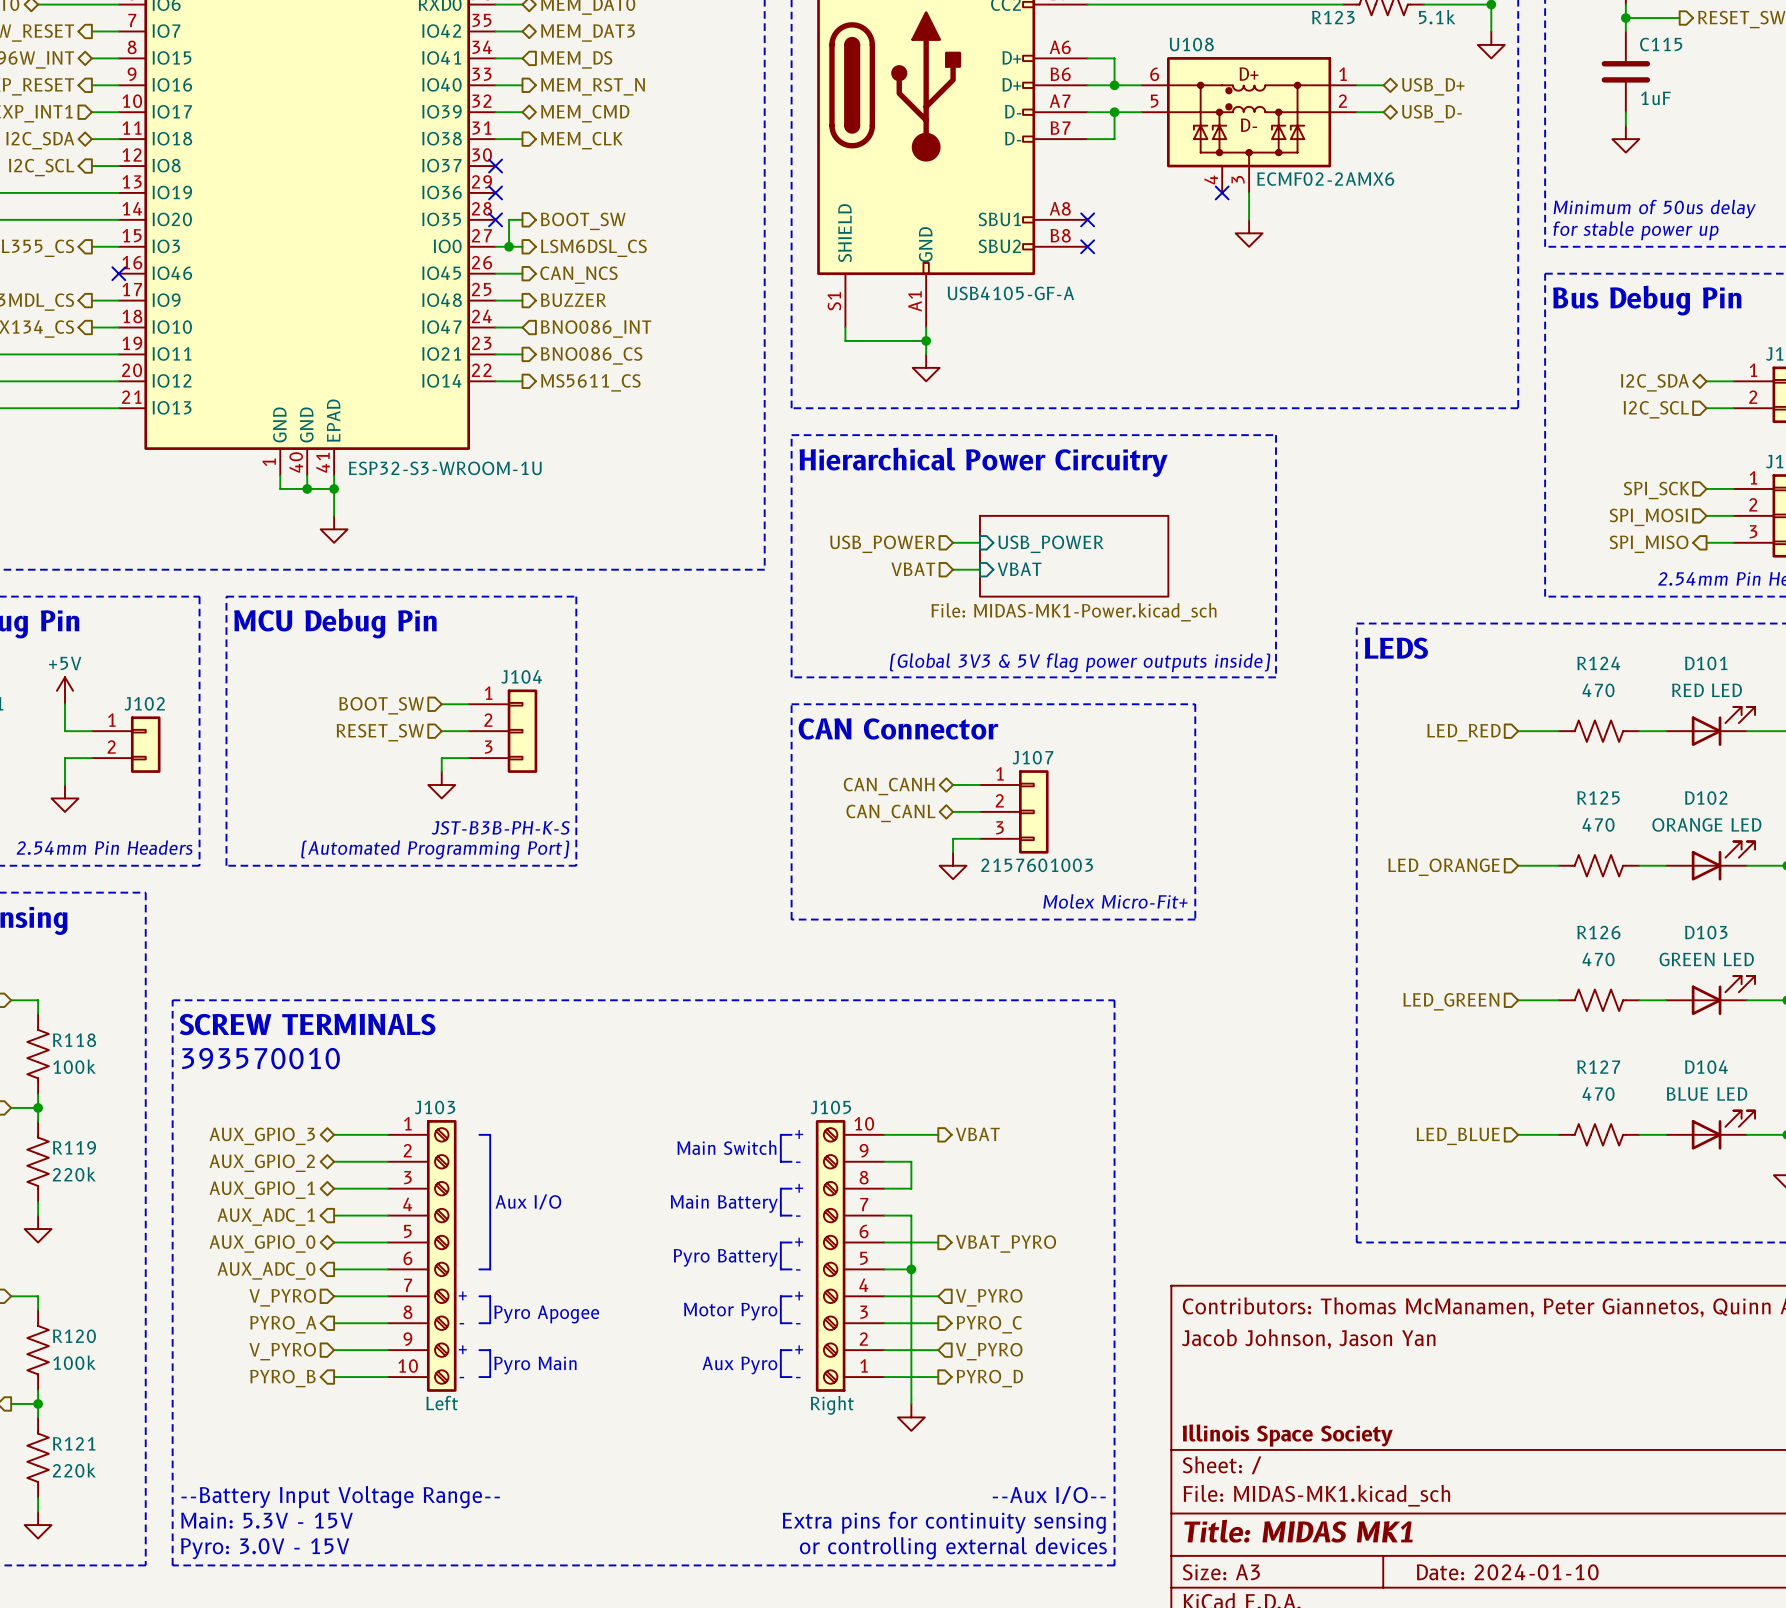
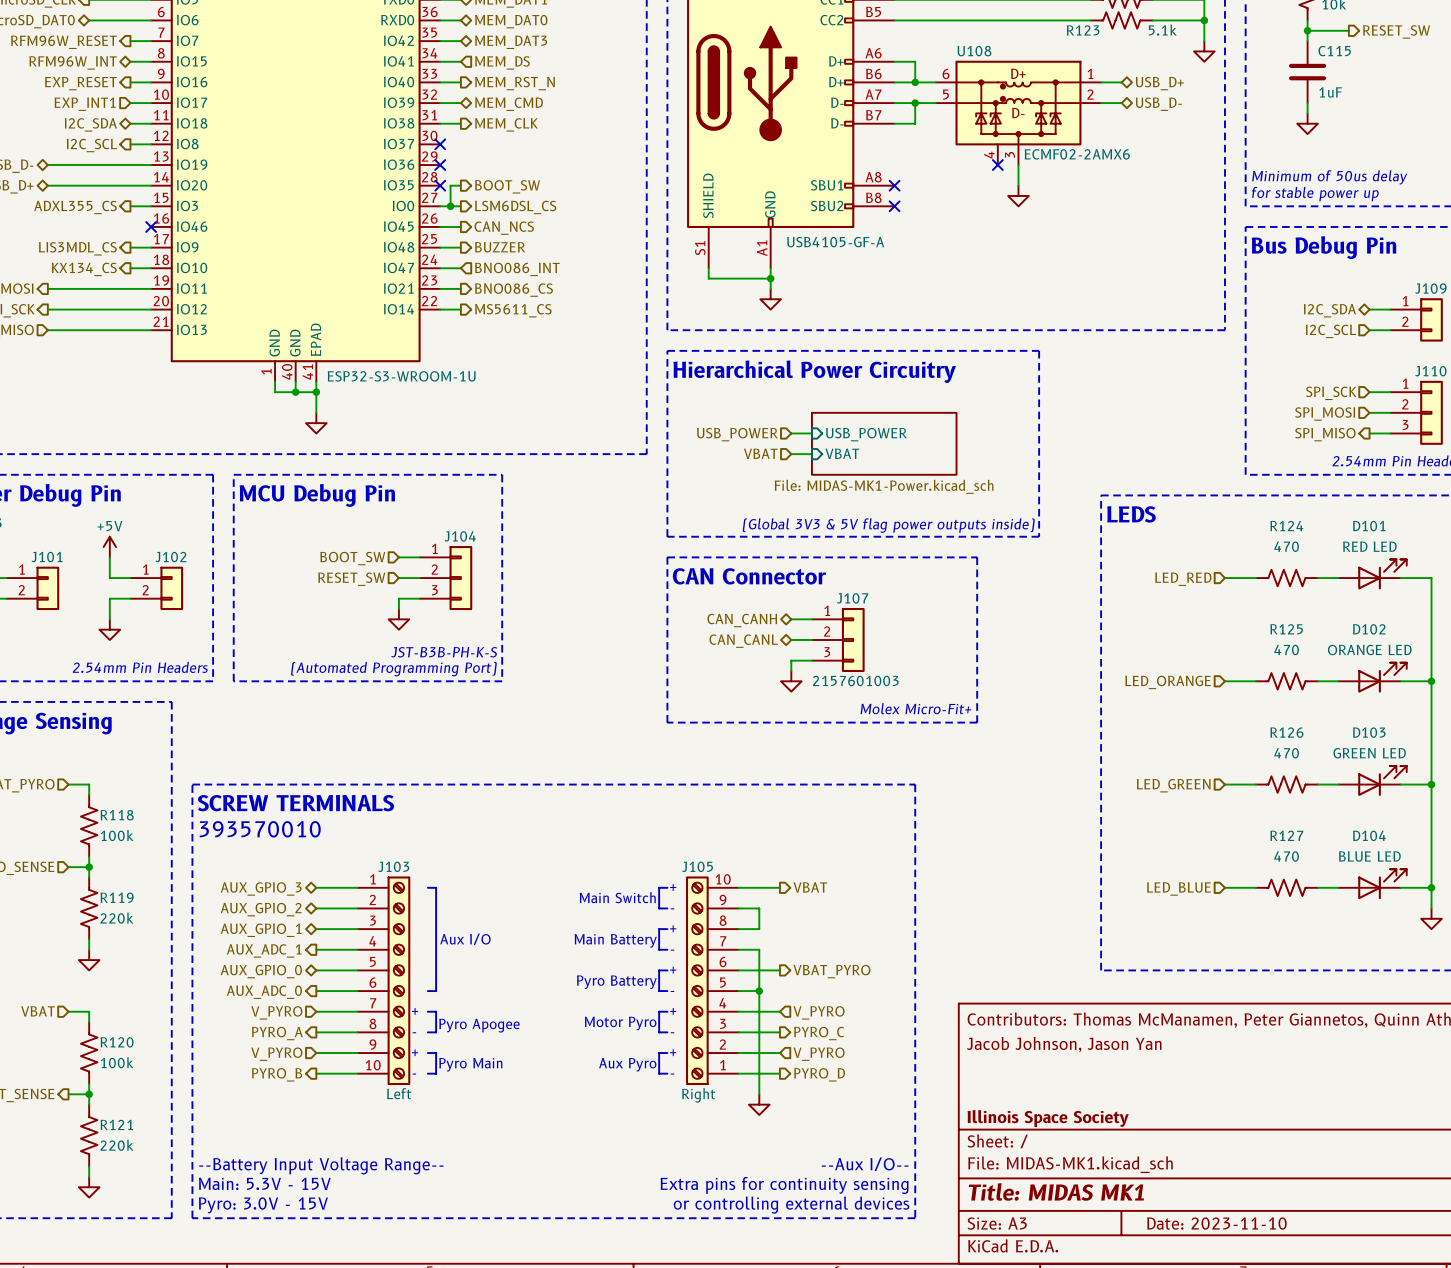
title block: Date: 2024-01-10 (1507, 1572) -> Date: 2023-11-10 (1216, 1223)

